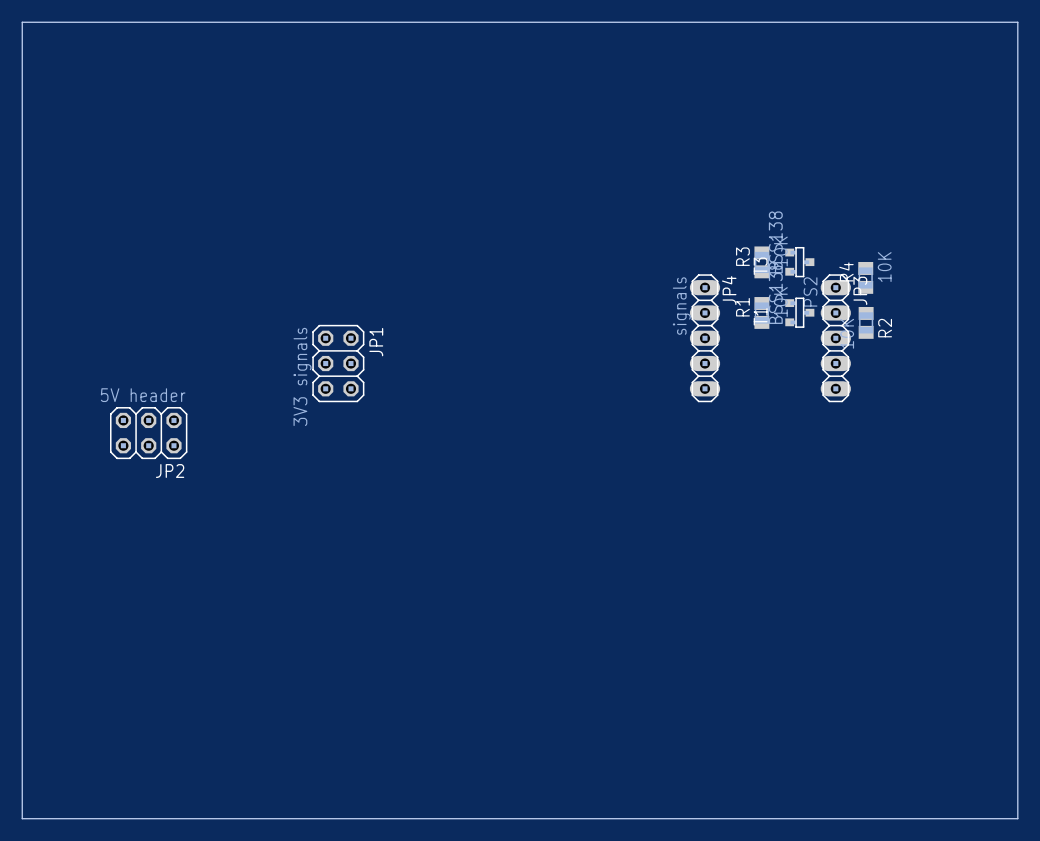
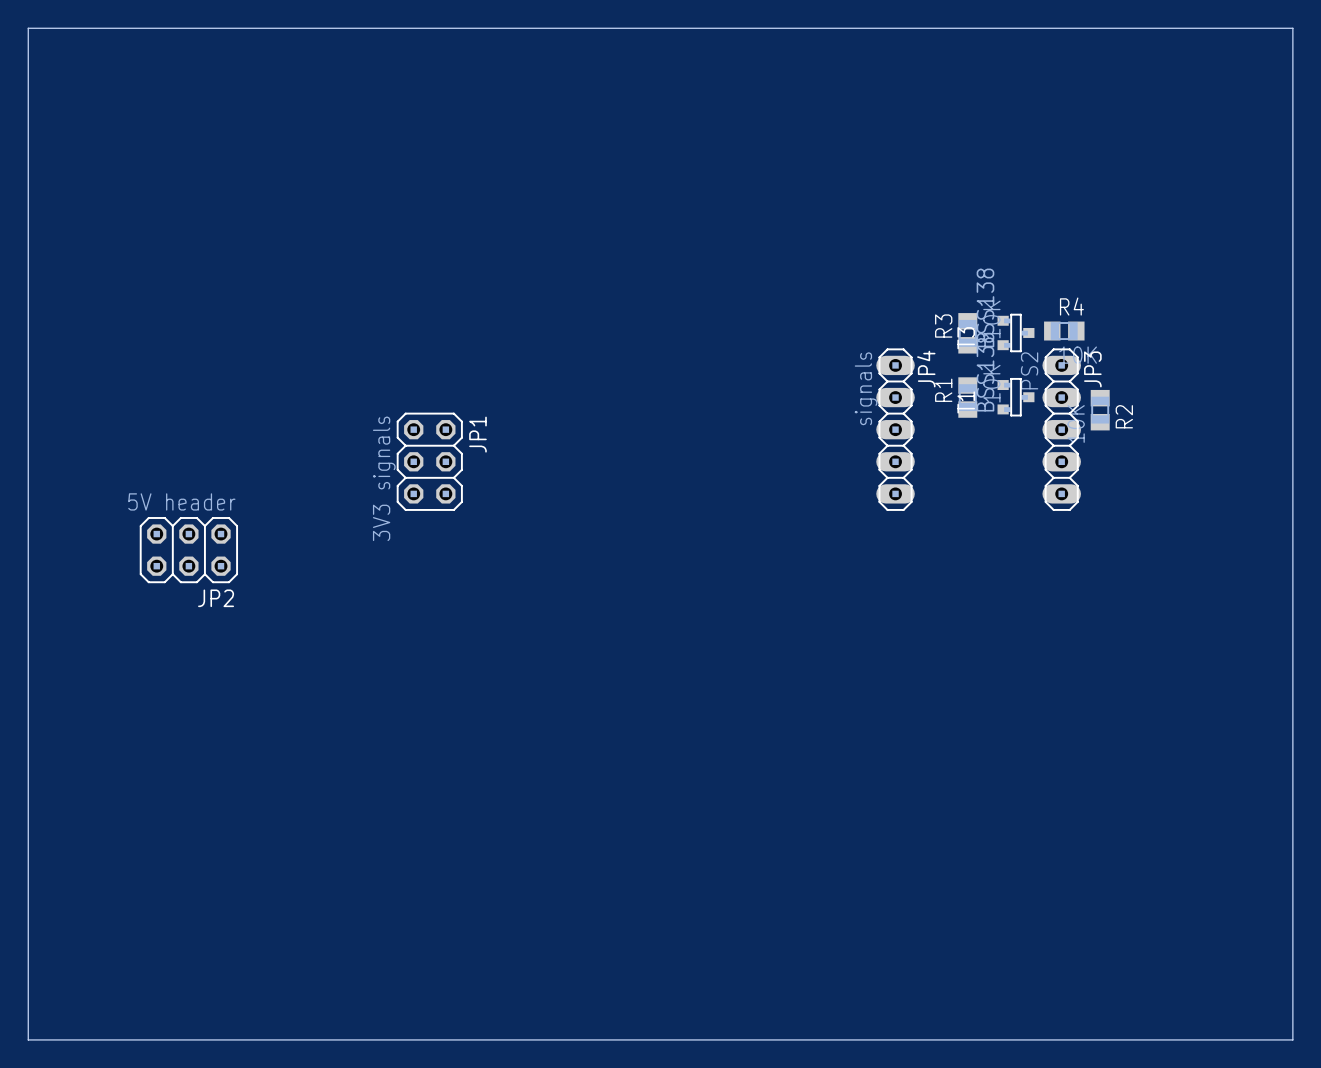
R4 rotation: 0° (865, 277) -> 90° clockwise (1064, 331)
R4 position: (865, 277) -> (1064, 331)

